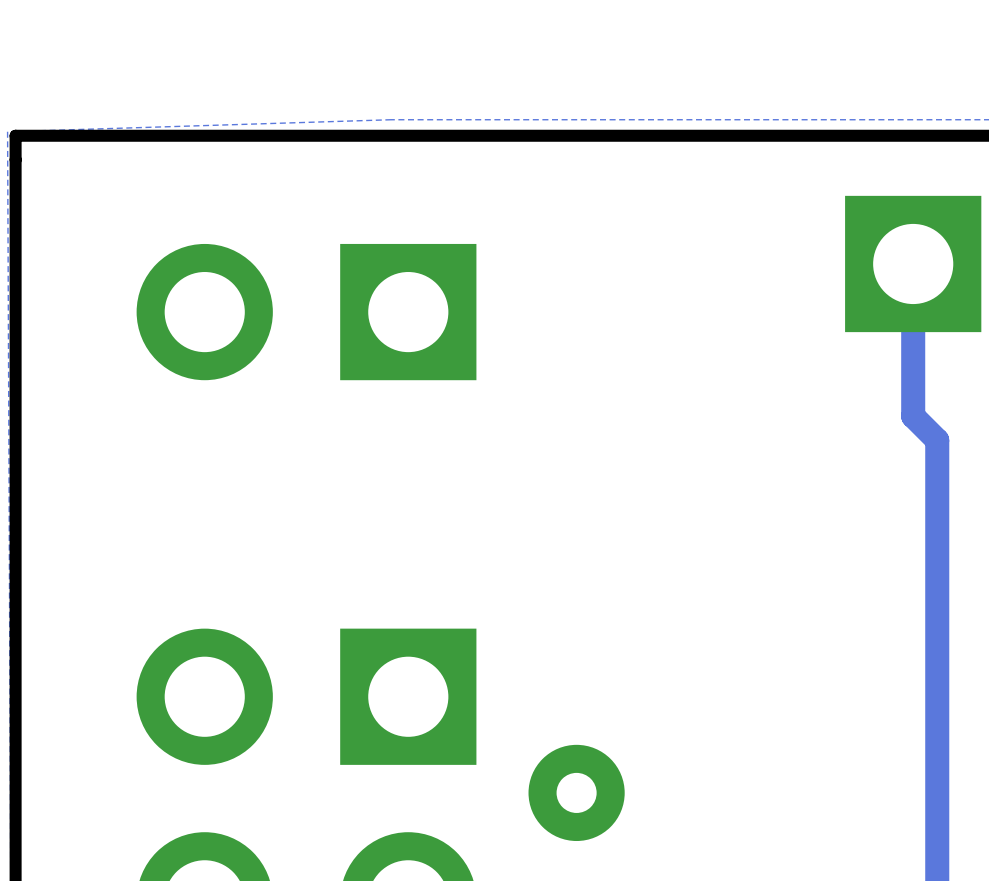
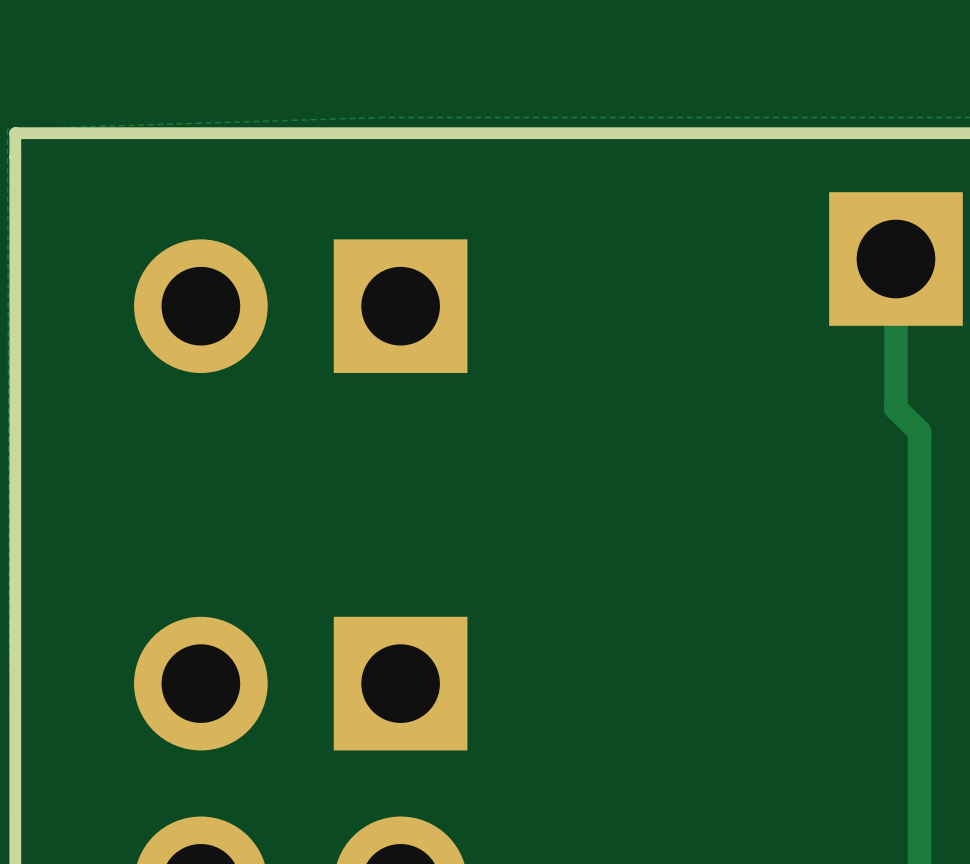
via: (576, 792) -> none

